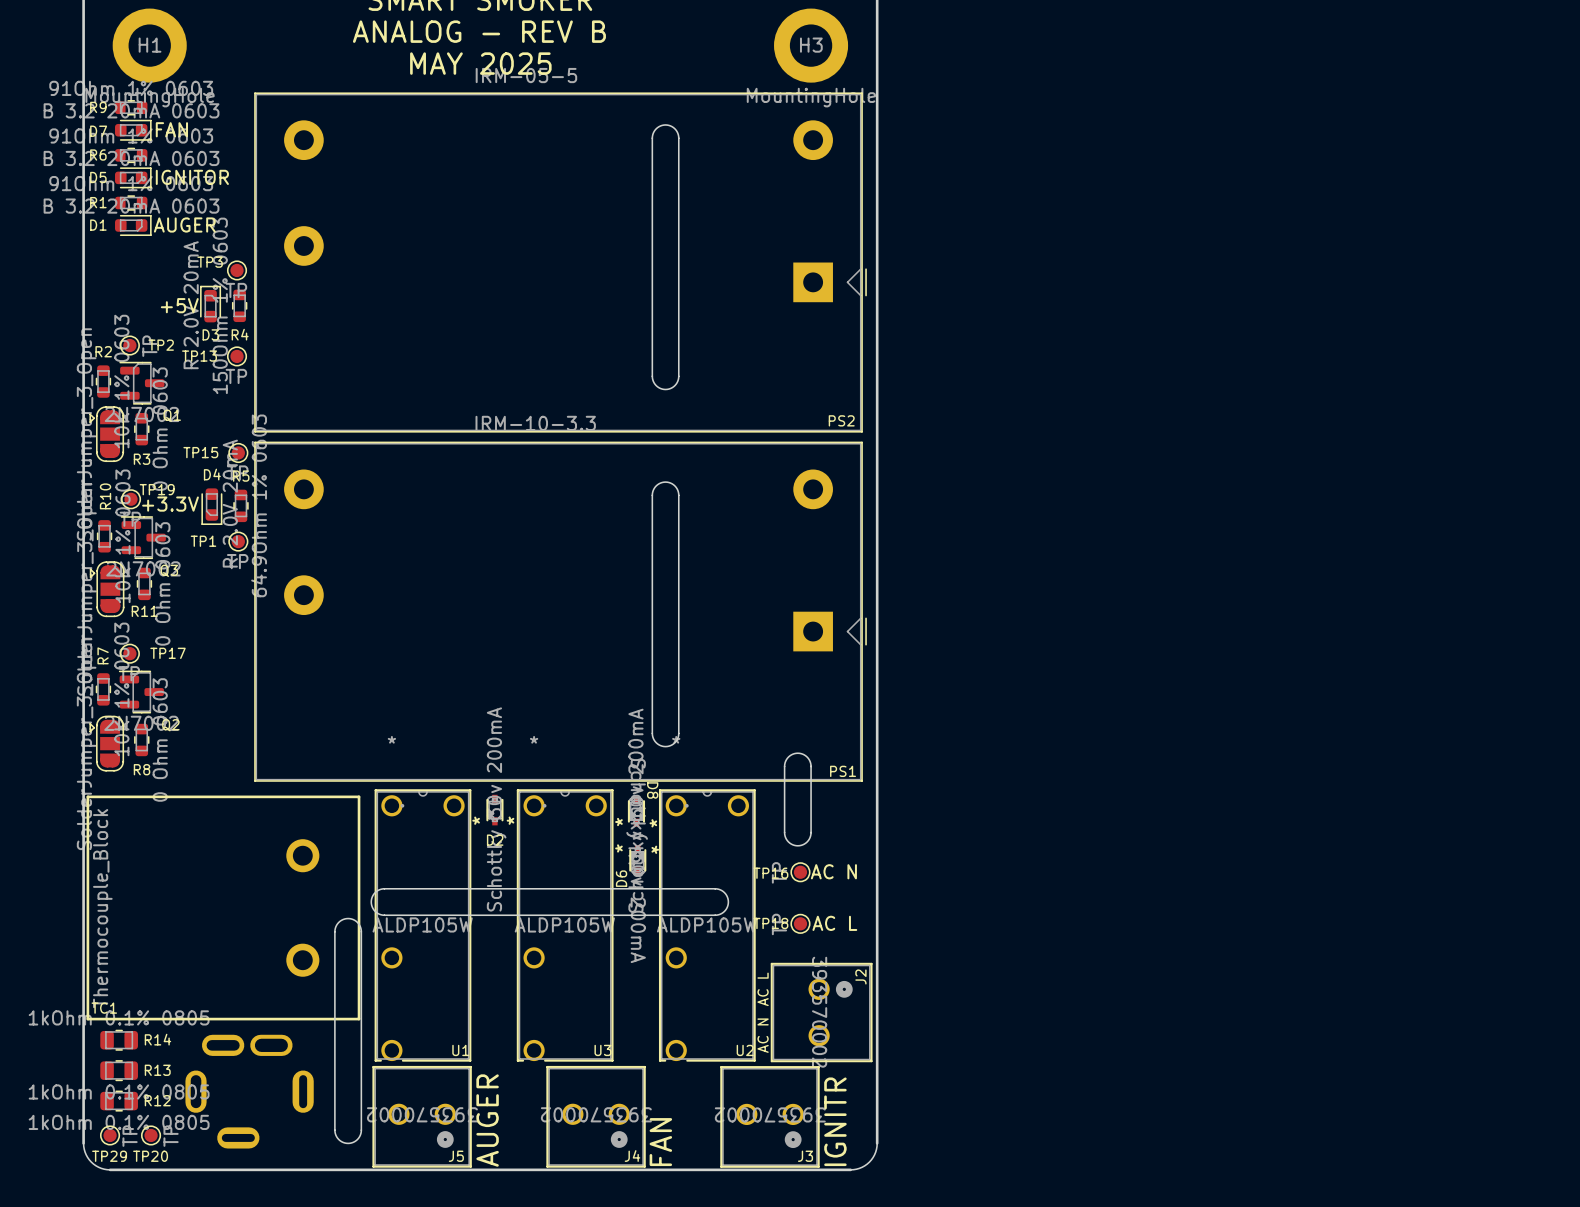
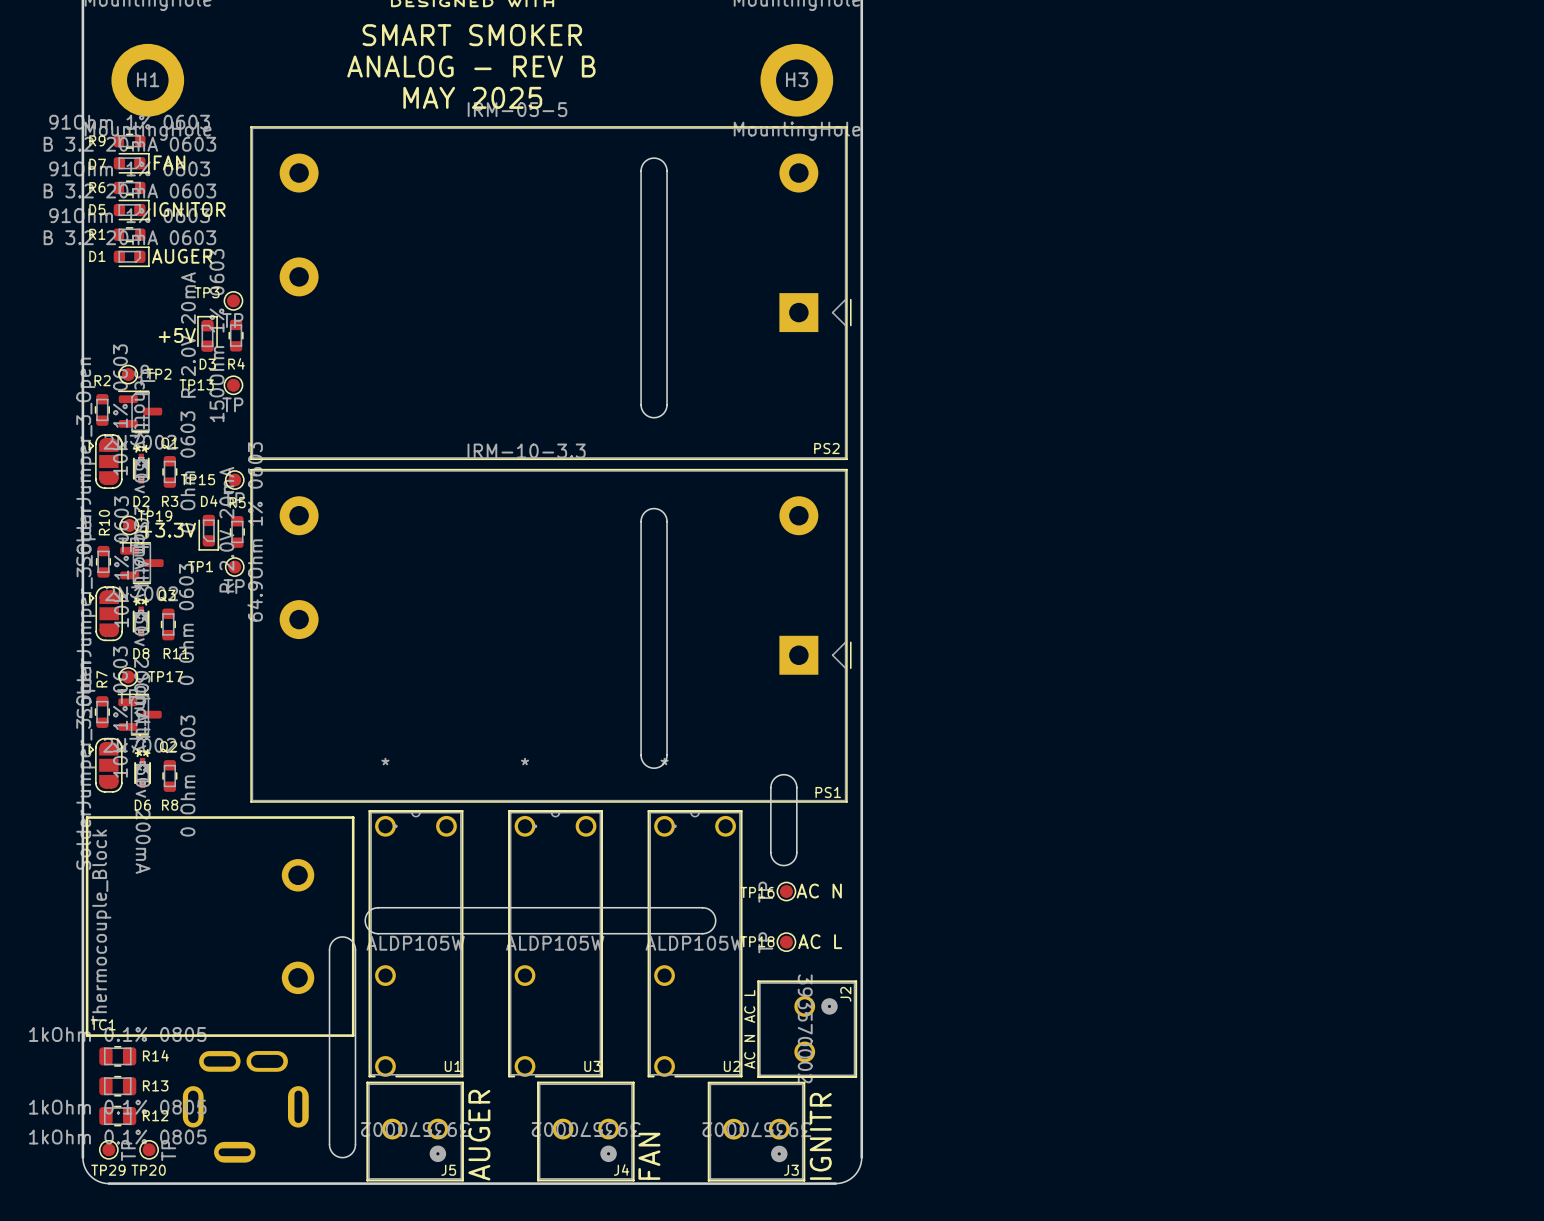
R3 position: (141, 429) -> (169, 471)
R11 position: (144, 583) -> (168, 624)
R11 name position: R11 (144, 611) -> R11 (176, 653)
R8 position: (141, 739) -> (169, 775)
D8 name position: D8 (652, 790) -> D8 (141, 653)
D2 footprint: [486, 794, 504, 826] -> [132, 453, 150, 484]
D8 footprint: [627, 796, 646, 827] -> [132, 606, 150, 637]
D6 footprint: [629, 845, 647, 876] -> [134, 758, 152, 789]

